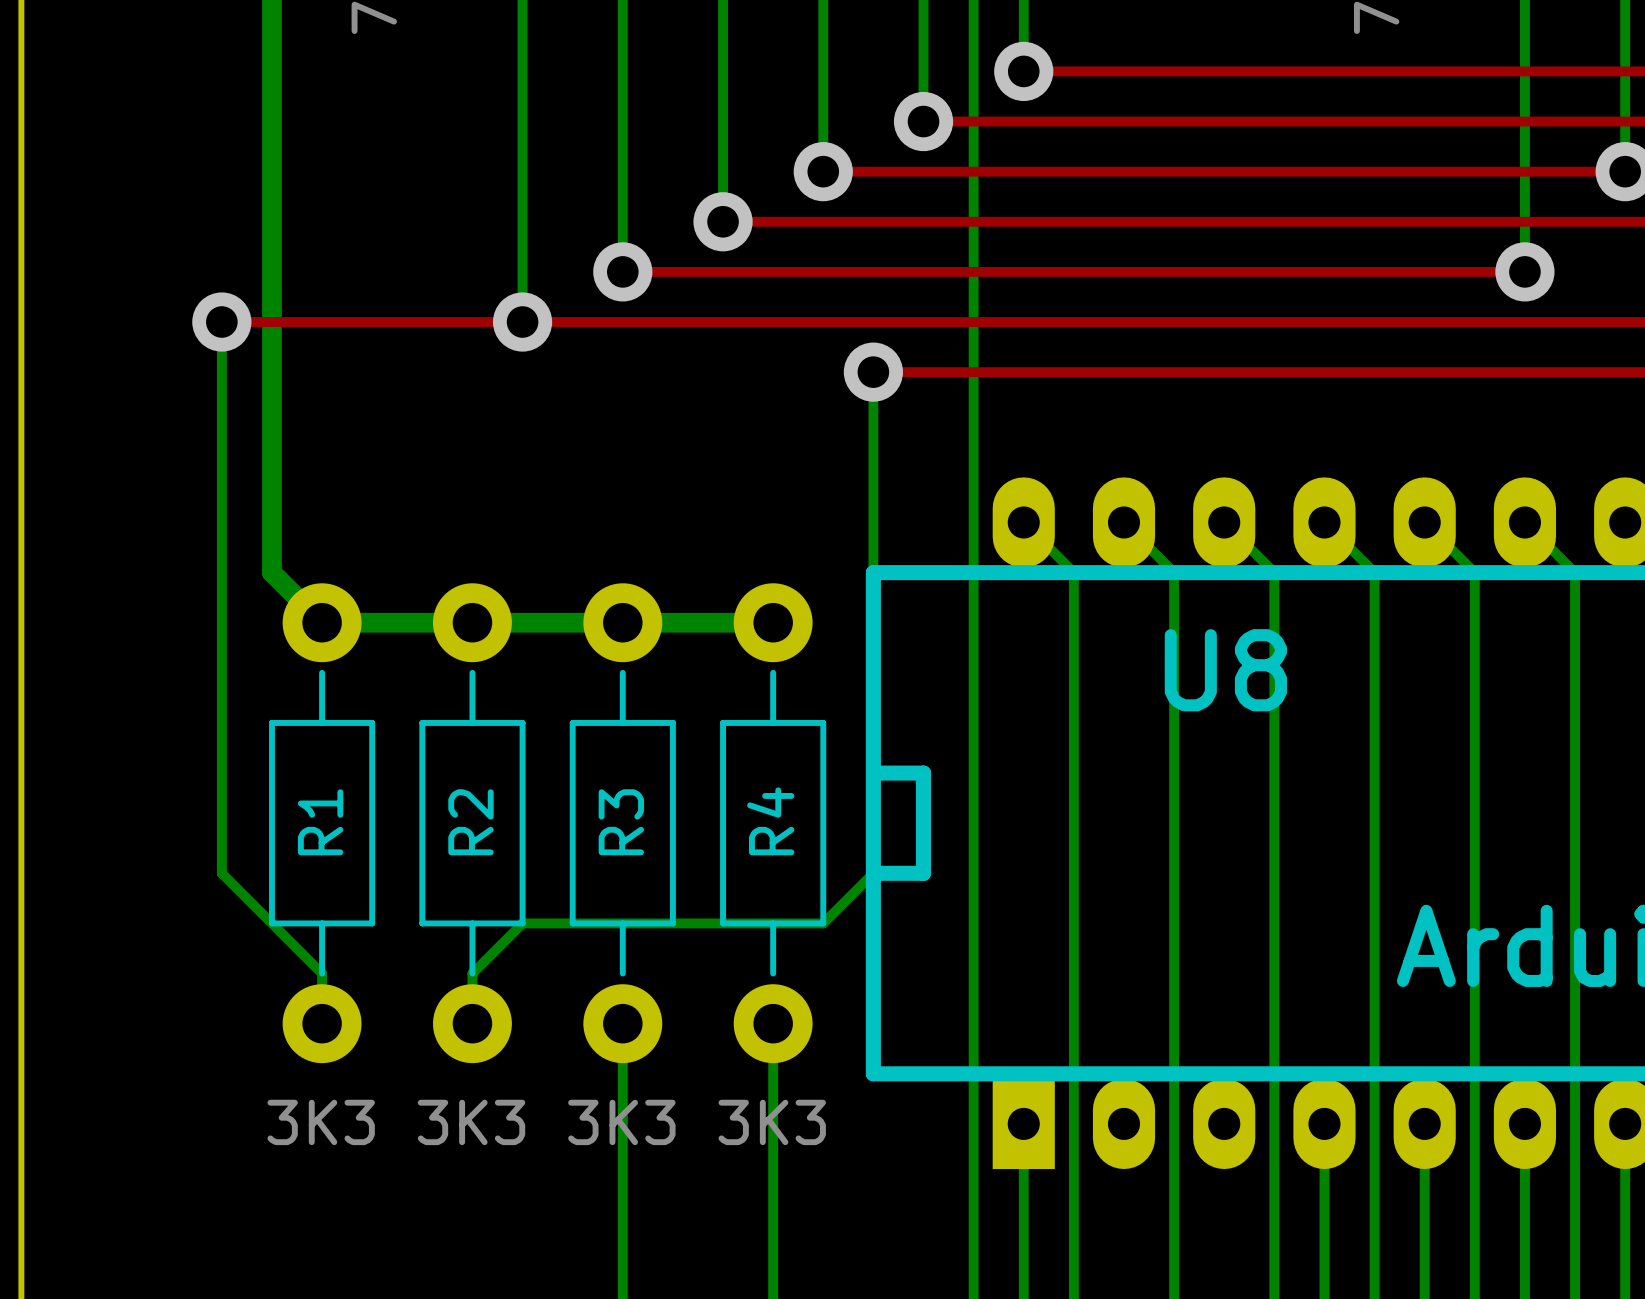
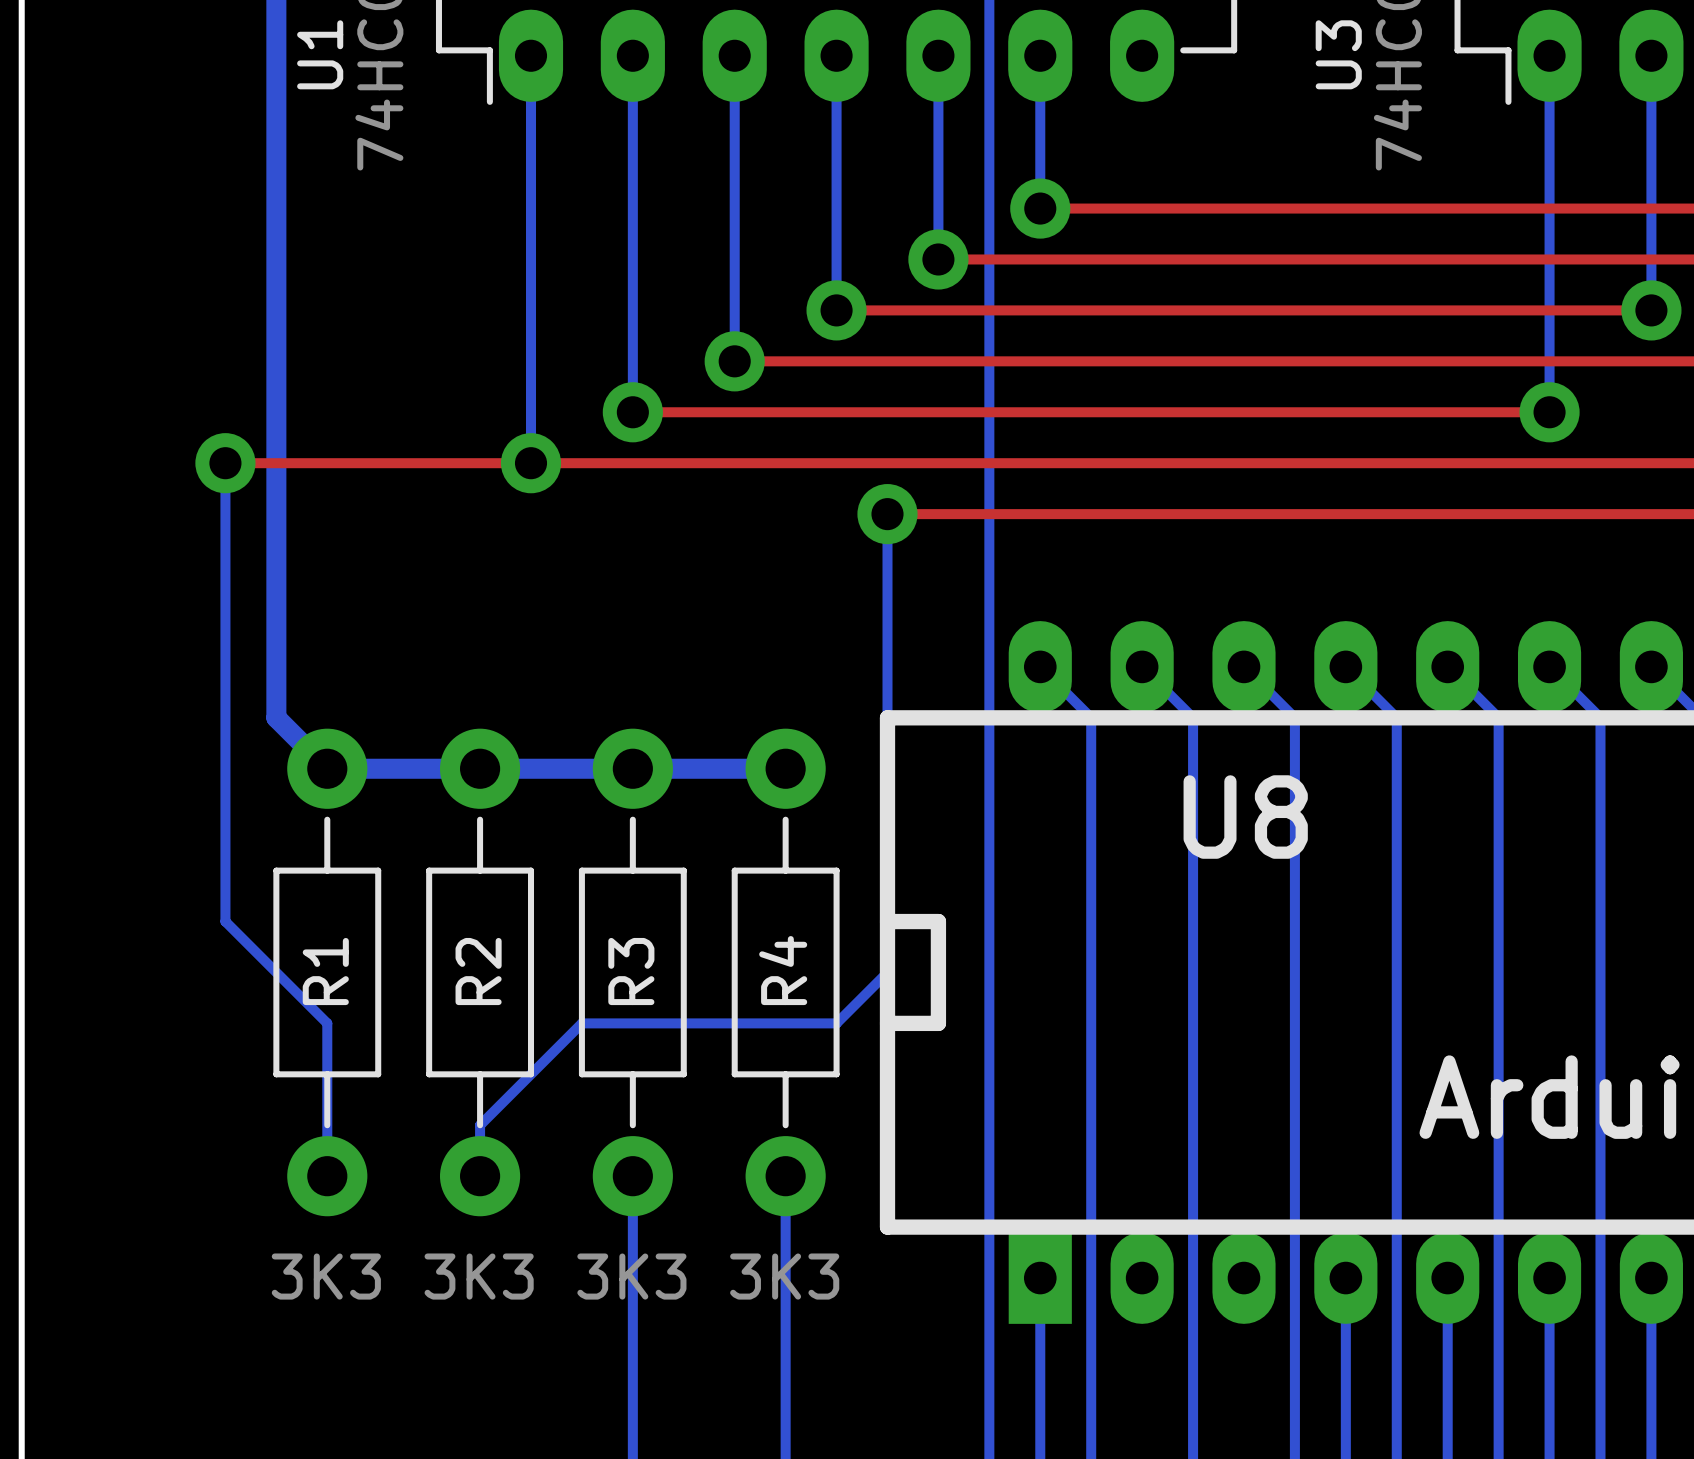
bottom track: (221, 773) (221, 873) (322, 973) -> (225, 921) (327, 1023) (327, 1125)
bottom track: (873, 823) (873, 873) (823, 923) (522, 923) -> (887, 972) (836, 1023) (581, 1023) (531, 1074)

